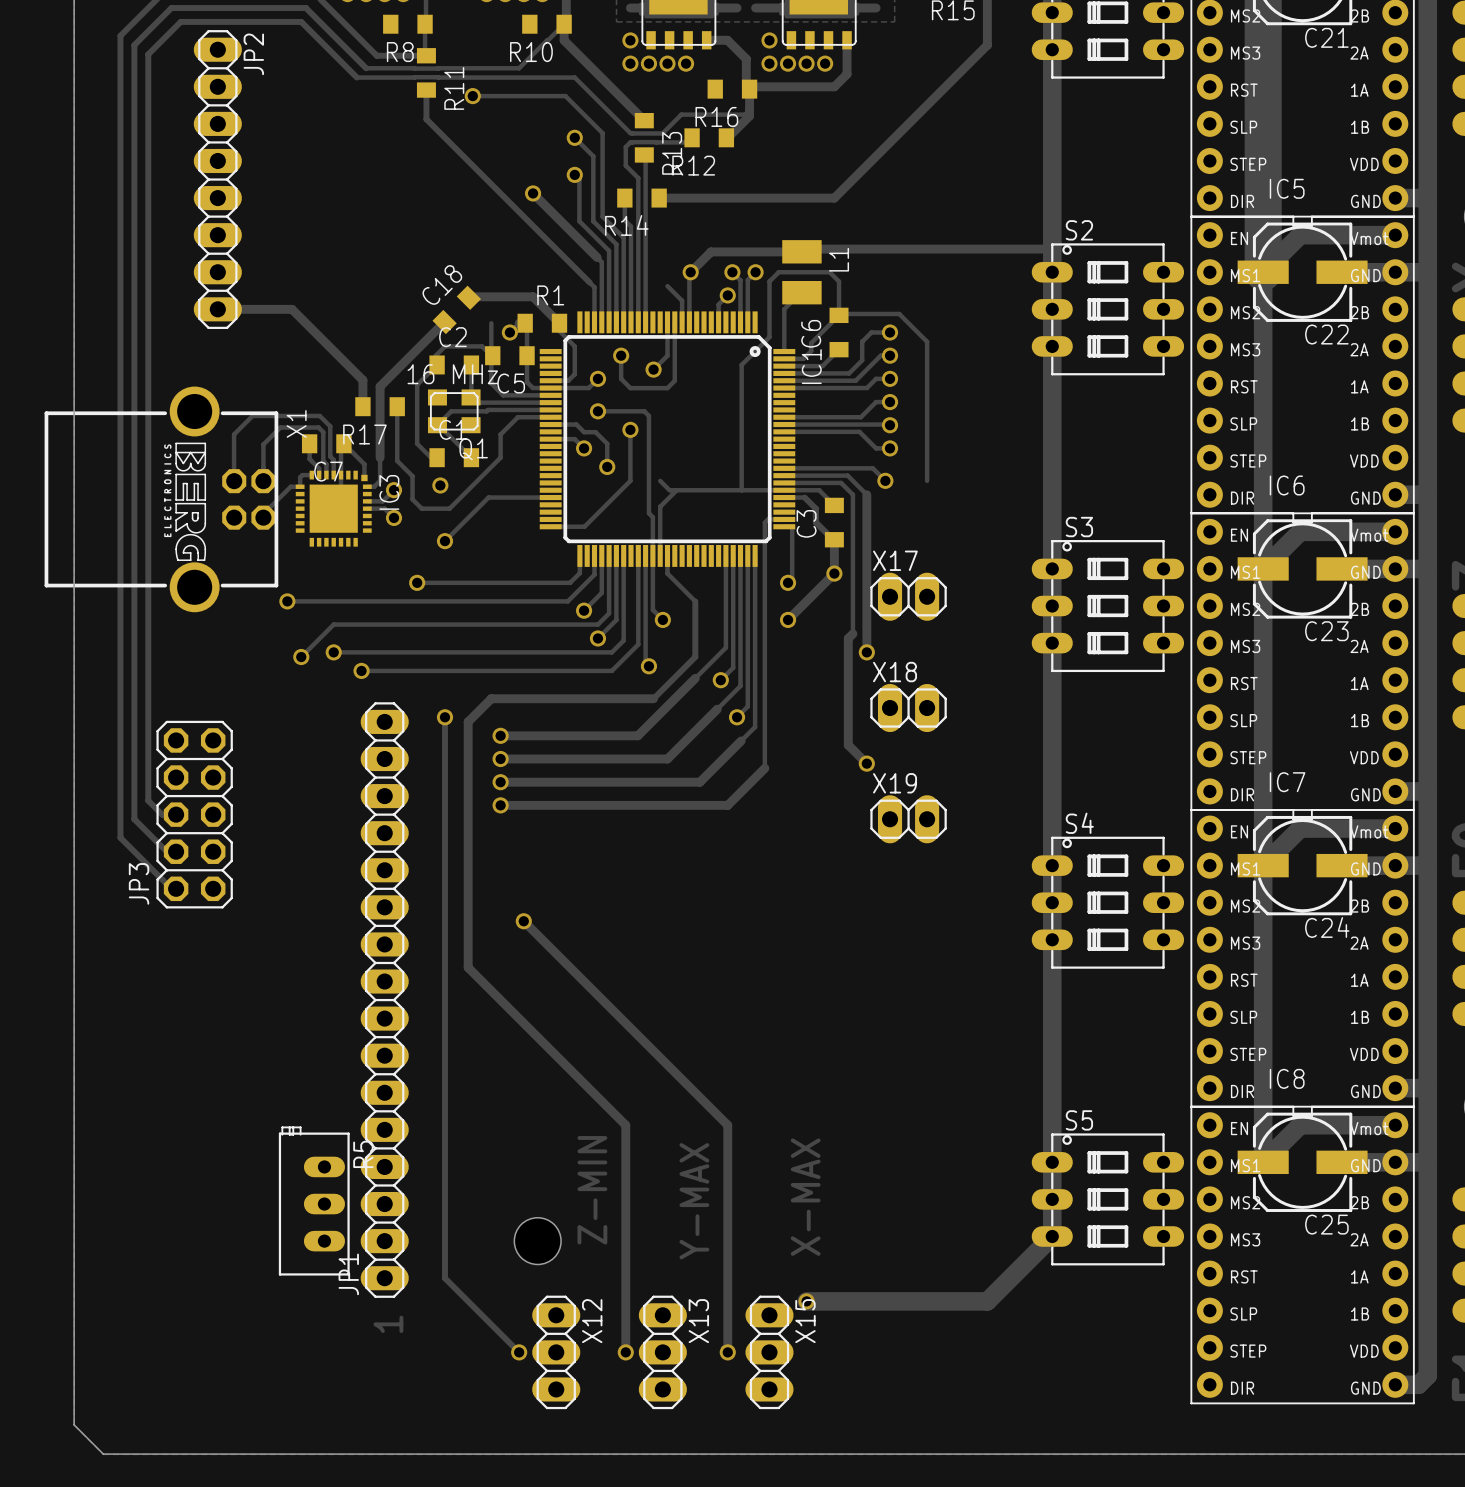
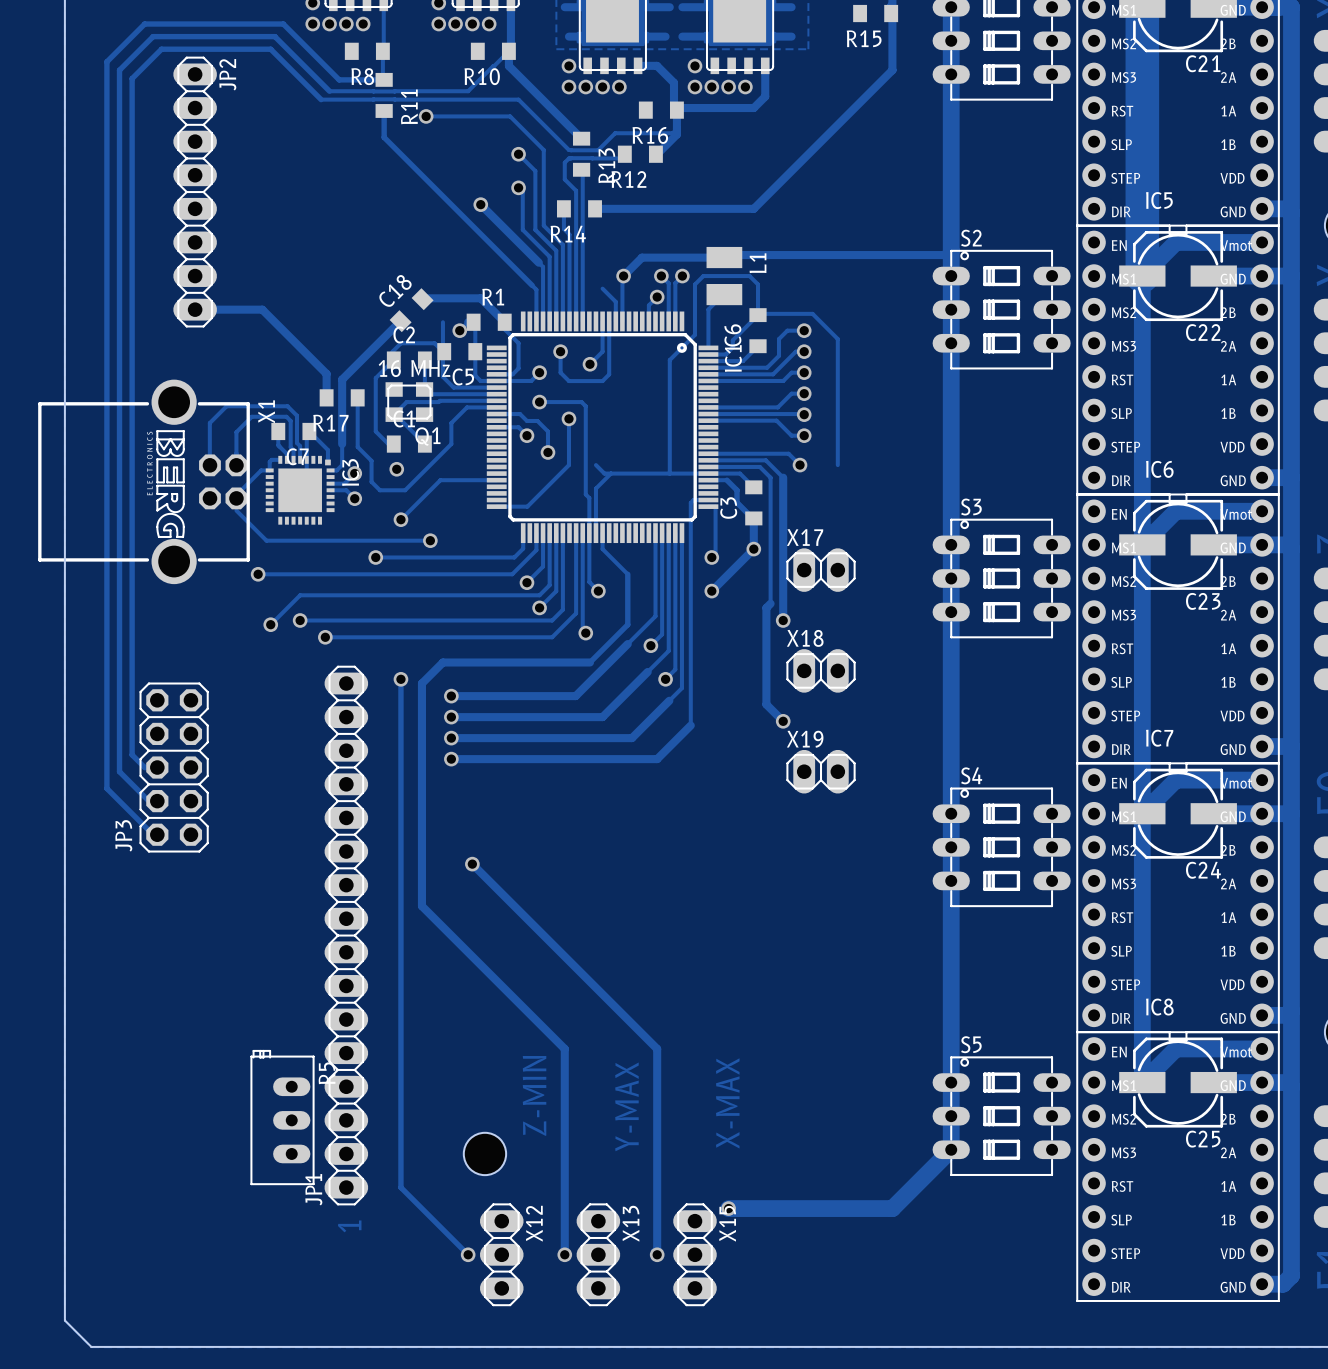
track: none -> (236, 510) (266, 540) (430, 540)
via: none -> (430, 540)

